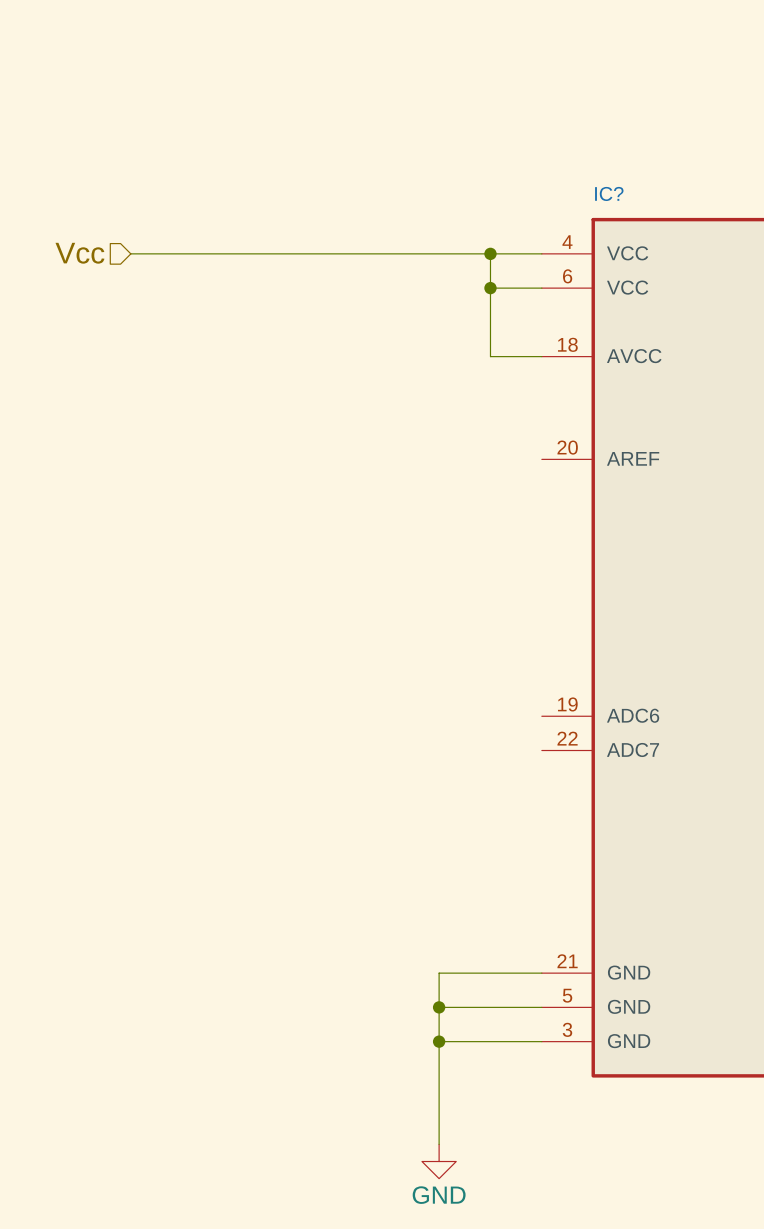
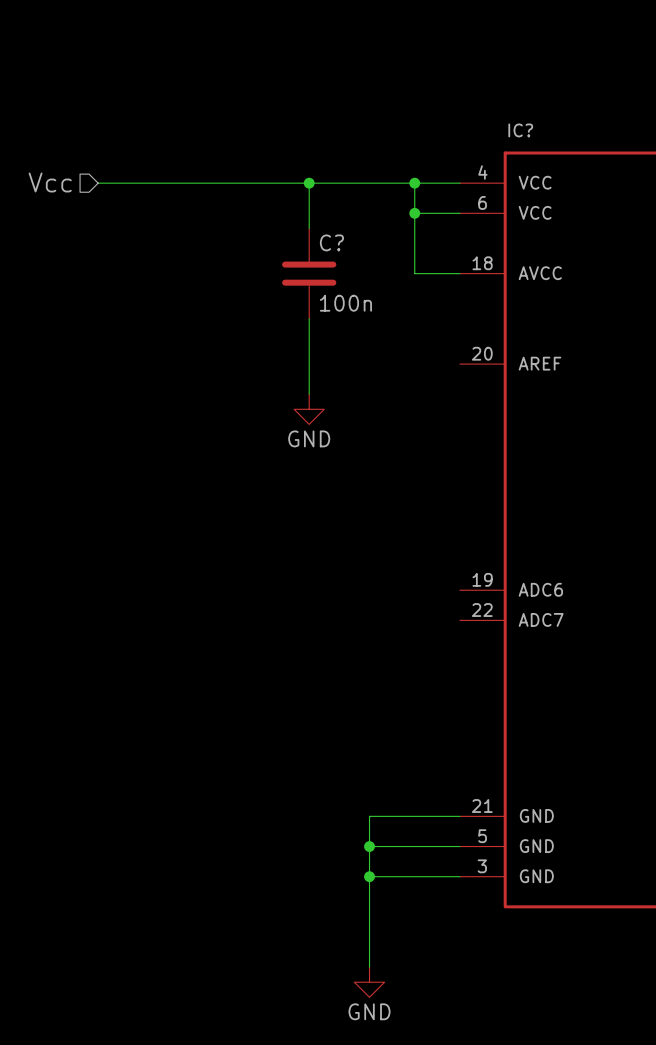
wire: none -> (309, 183) (309, 228)
junction: none -> (309, 183)
C?: none -> 100n (309, 273)
wire: none -> (309, 318) (309, 394)
power symbol: none -> GND (309, 409)

